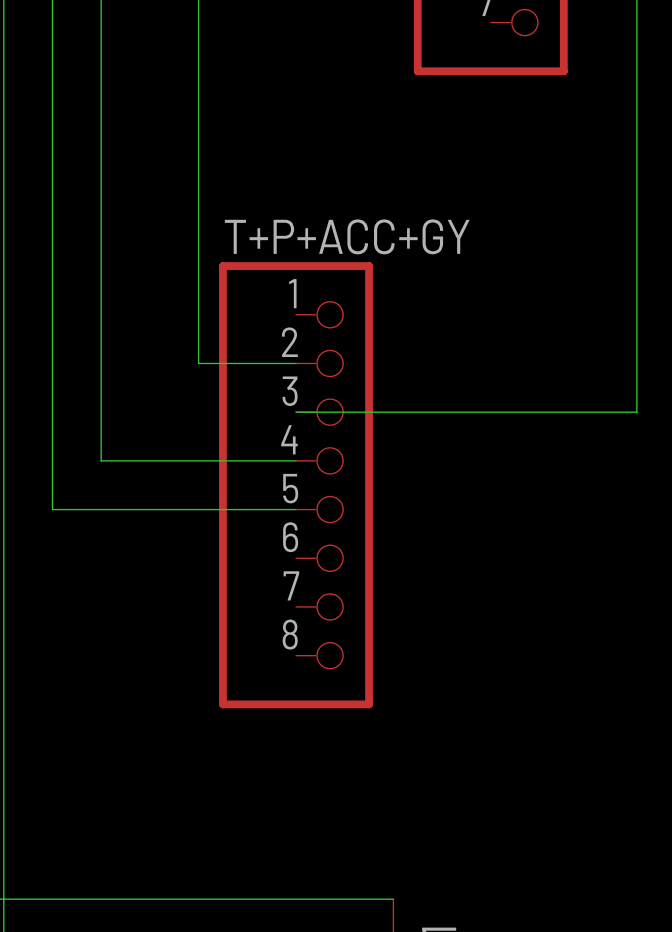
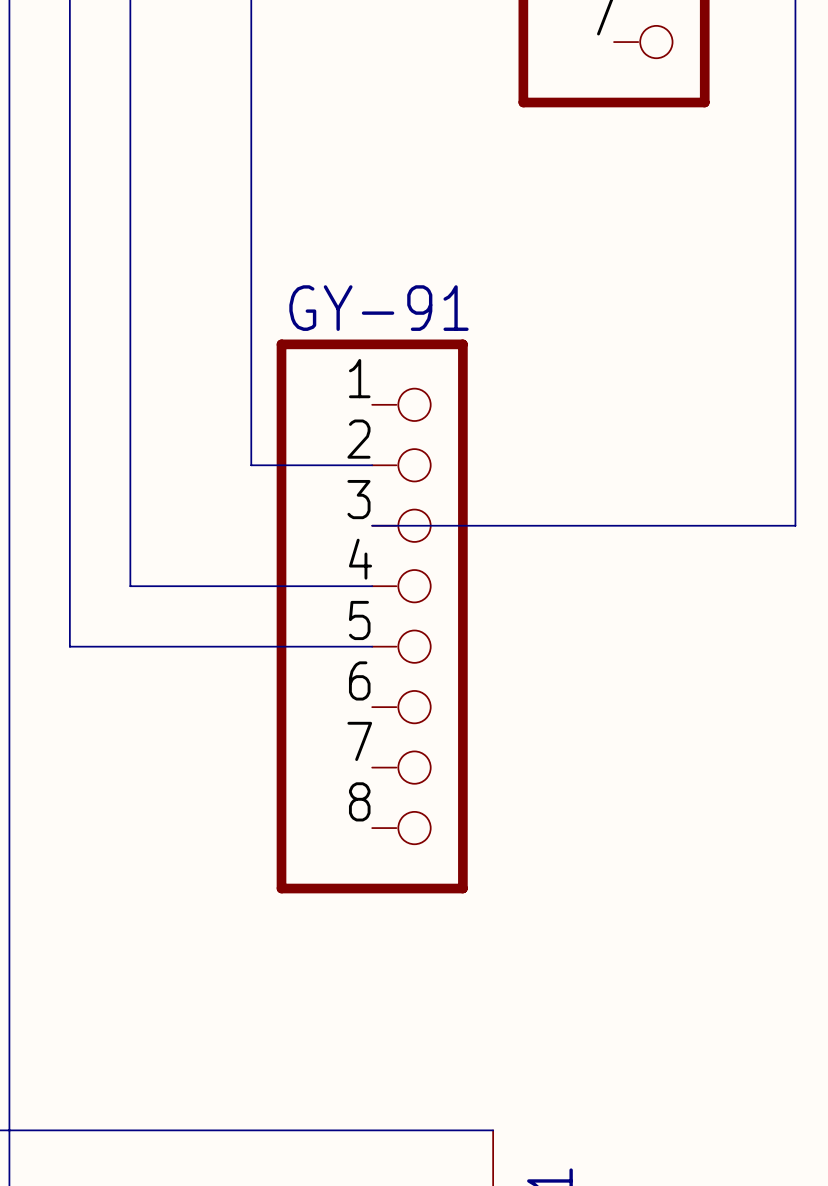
T+P+ACC+GY name: T+P+ACC+GY (347, 236) -> GY-91 (378, 308)

